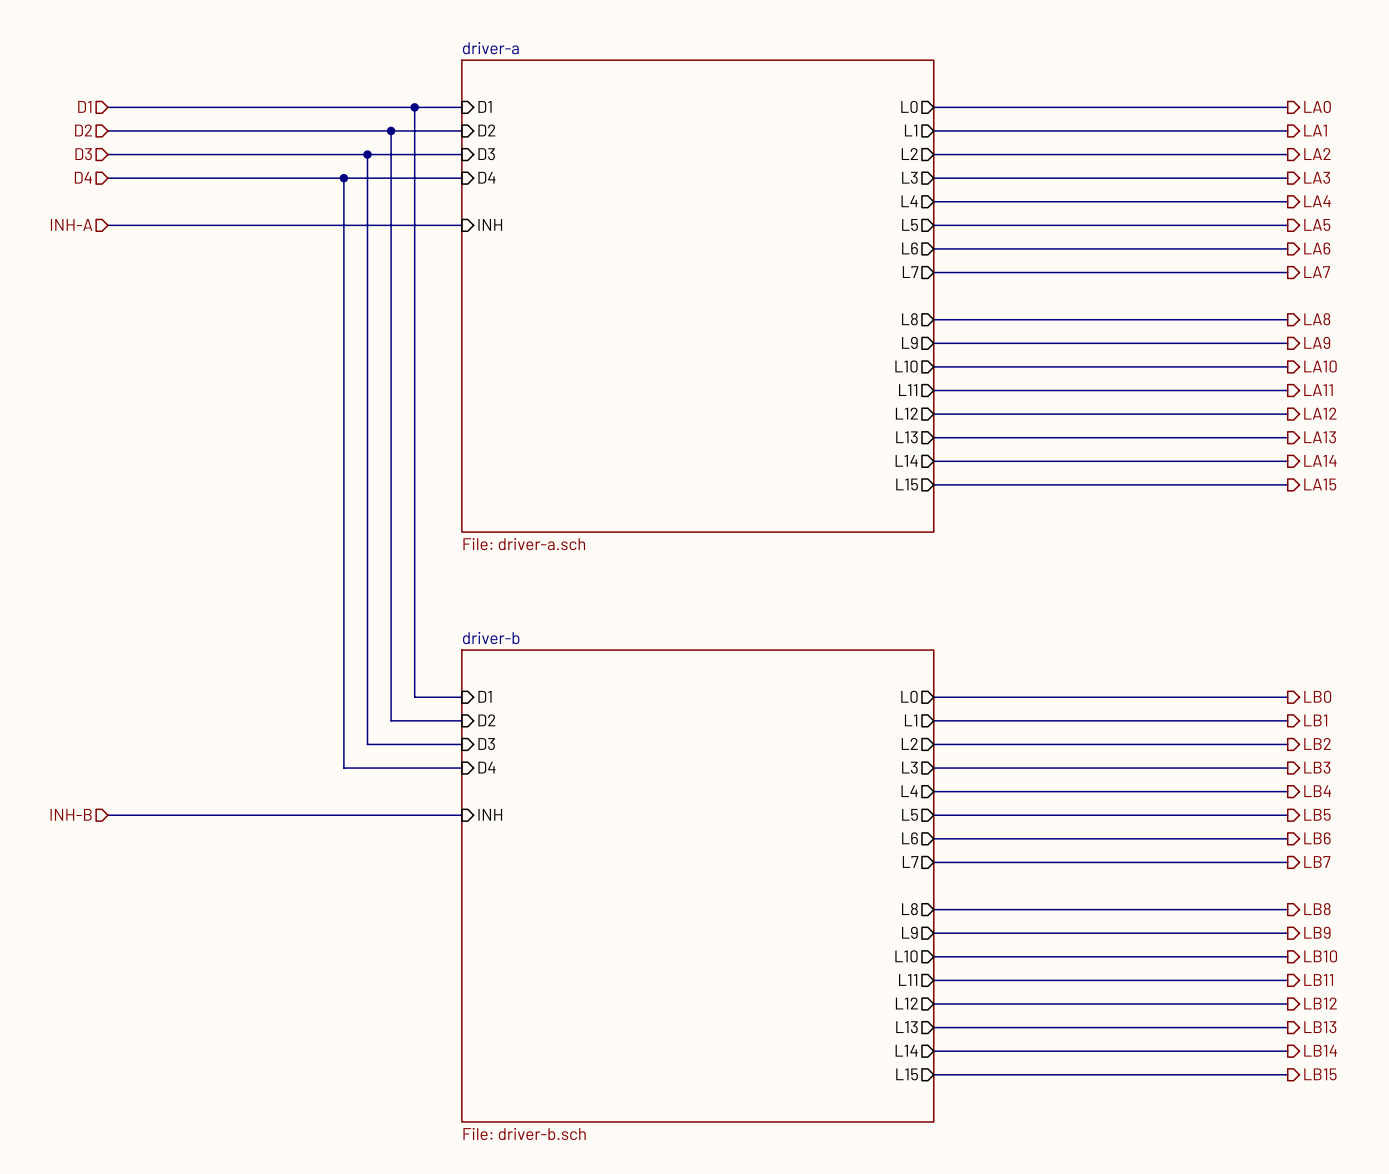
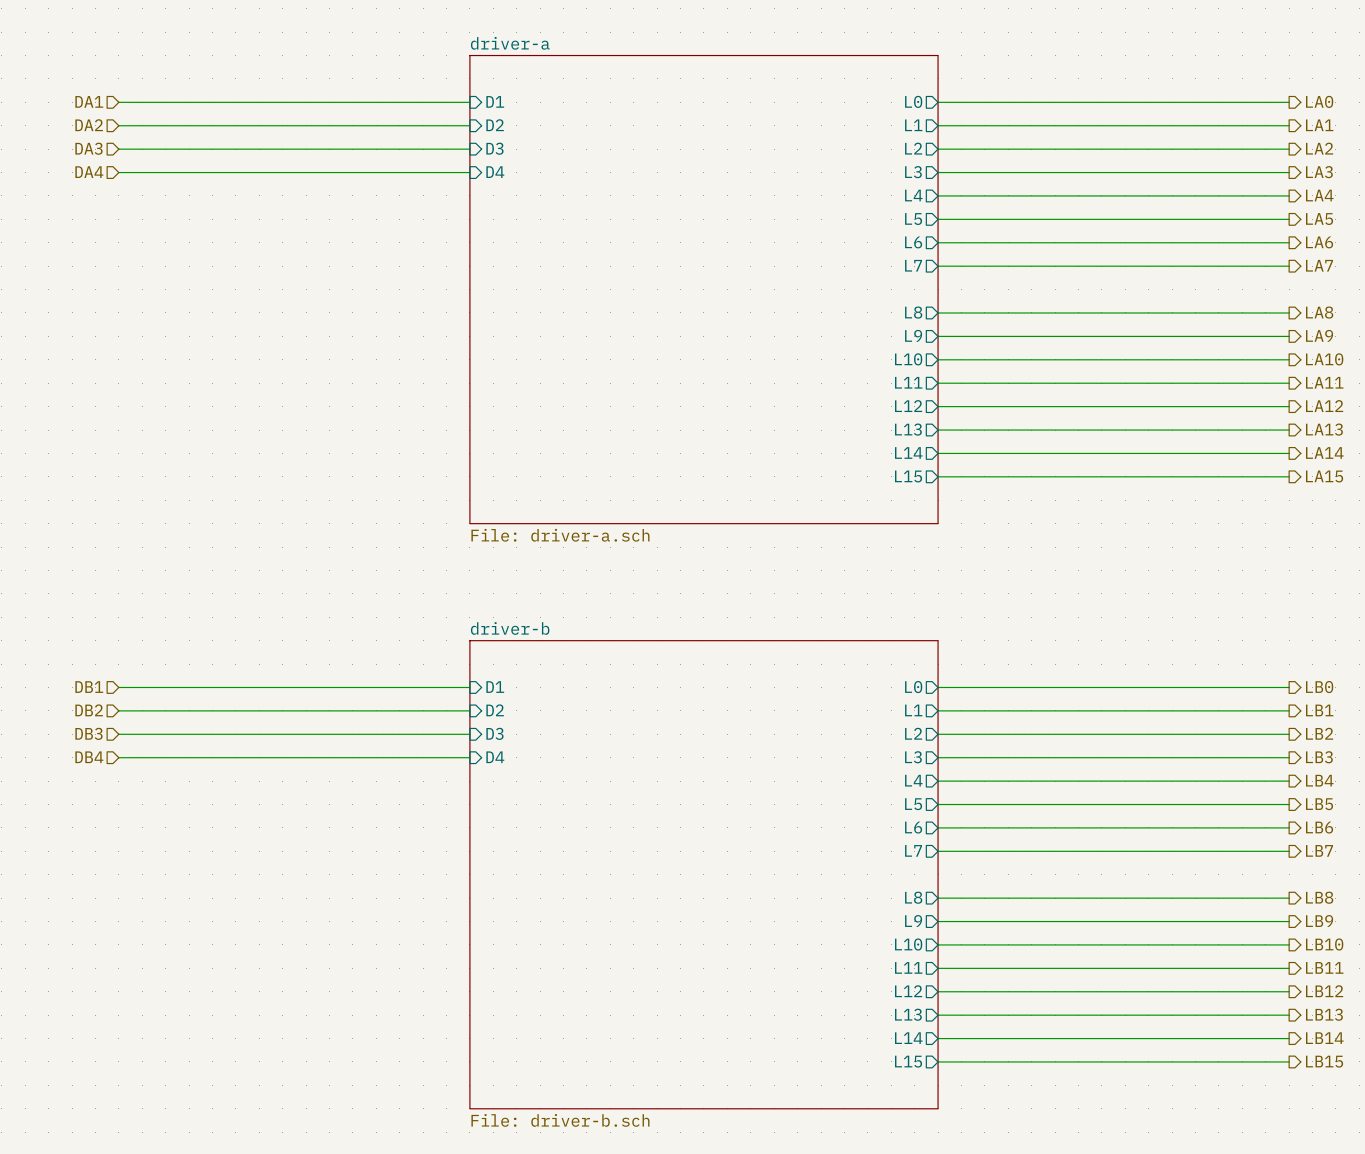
hierarchical label: D1 (84, 106) -> DA1 (89, 101)
wire: (414, 107) (414, 697) -> (118, 687) (423, 687)
junction: (414, 107) -> none
hierarchical label: D2 (83, 130) -> DA2 (89, 125)
wire: (391, 130) (391, 720) -> (118, 710) (399, 710)
junction: (391, 130) -> none
hierarchical label: D3 (83, 154) -> DA3 (88, 148)
wire: (367, 154) (367, 744) -> (118, 734) (376, 734)
junction: (367, 154) -> none
hierarchical label: D4 (83, 177) -> DA4 (89, 172)
wire: (343, 178) (343, 768) -> (118, 757) (352, 757)
junction: (343, 178) -> none
hierarchical label: INH-A (71, 224) -> none
sheet pin: INH (490, 224) -> none
wire: (107, 225) (461, 225) -> none
hierarchical label: none -> DB1 (89, 687)
hierarchical label: none -> DB2 (89, 710)
hierarchical label: none -> DB3 (88, 733)
hierarchical label: none -> DB4 (89, 757)
hierarchical label: INH-B (71, 814) -> none
sheet pin: INH (490, 814) -> none
wire: (107, 815) (461, 815) -> none

